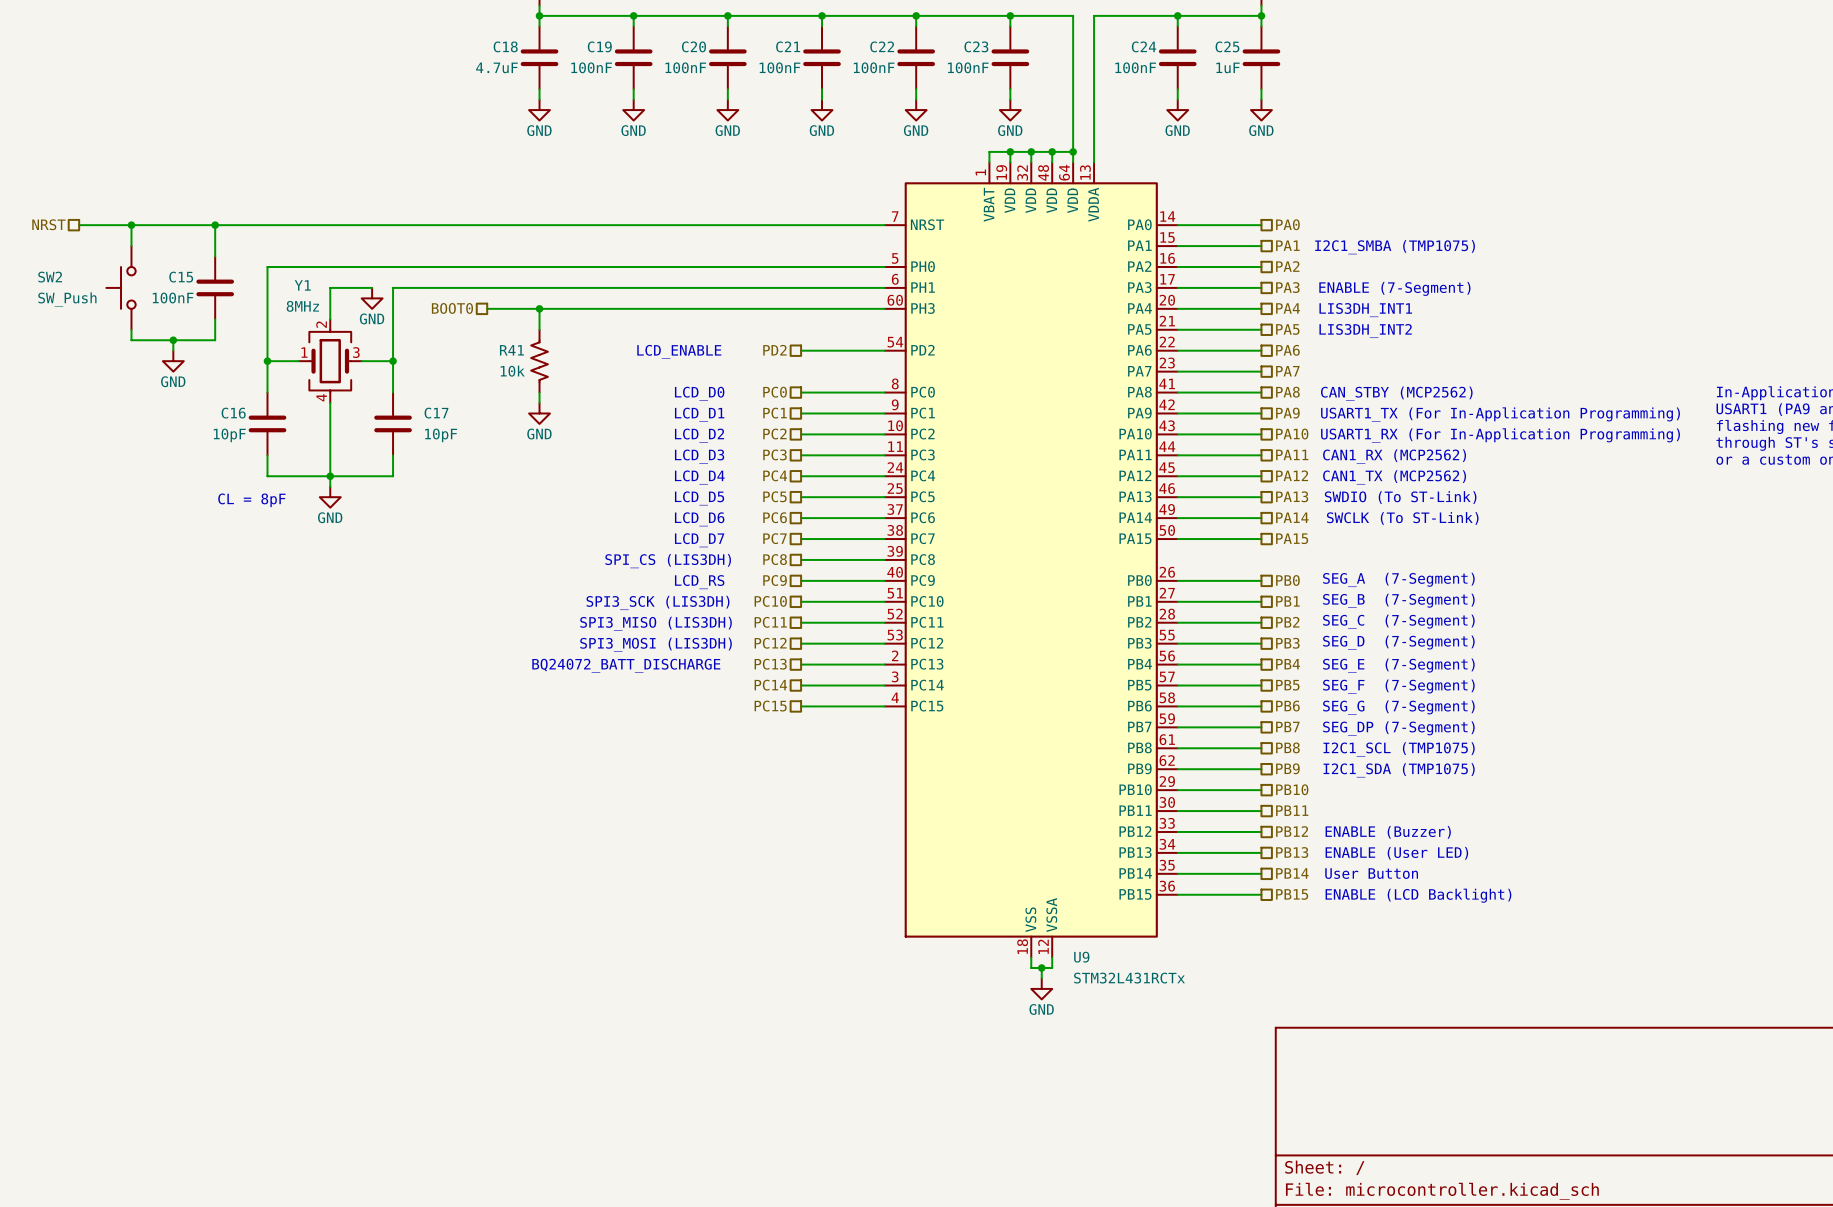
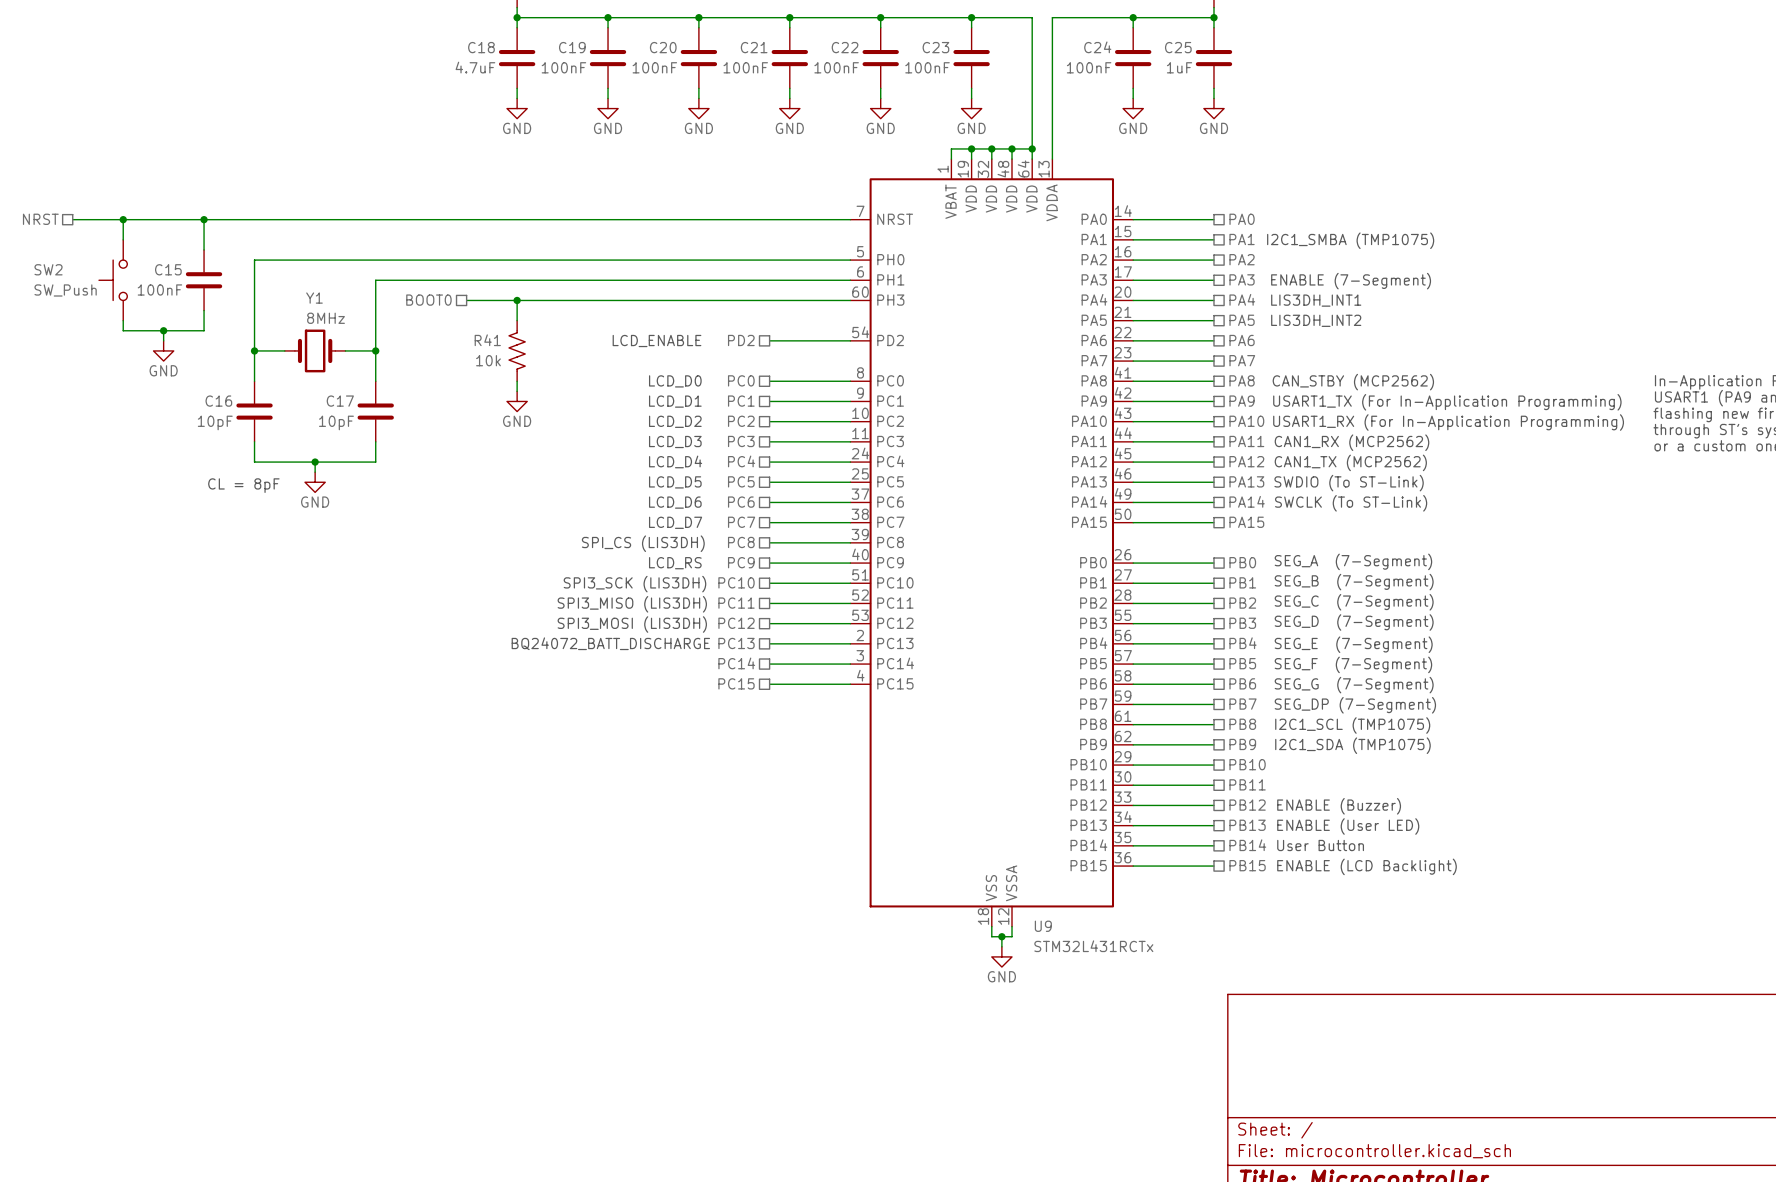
Y1 name position: Y1 (302, 285) -> Y1 (314, 298)
wire: (372, 287) (330, 287) (330, 319) -> none
power symbol: GND (372, 298) -> none
Y1 value position: 8MHz (302, 306) -> 8MHz (326, 318)
Y1 symbol: [298, 319, 362, 404] -> [284, 329, 346, 373]
wire: (330, 403) (330, 476) -> none
C17 name position: C17 (436, 413) -> C17 (340, 401)
C17 value position: 10pF (441, 435) -> 10pF (336, 422)

